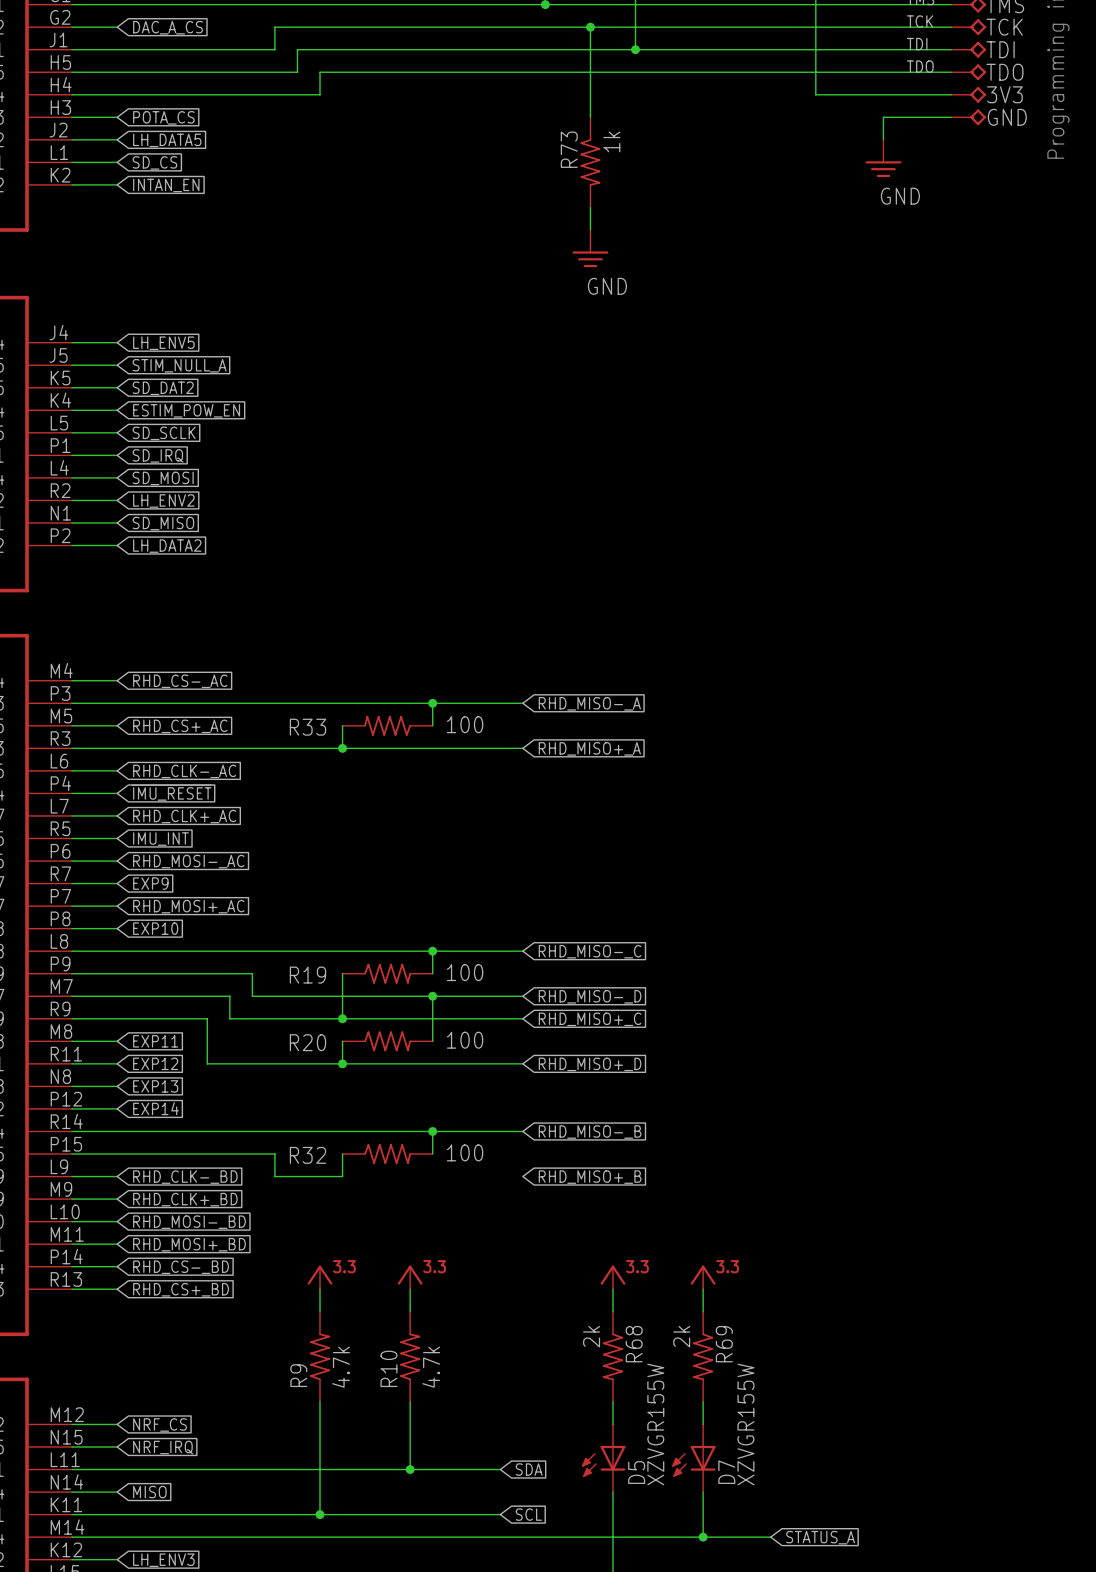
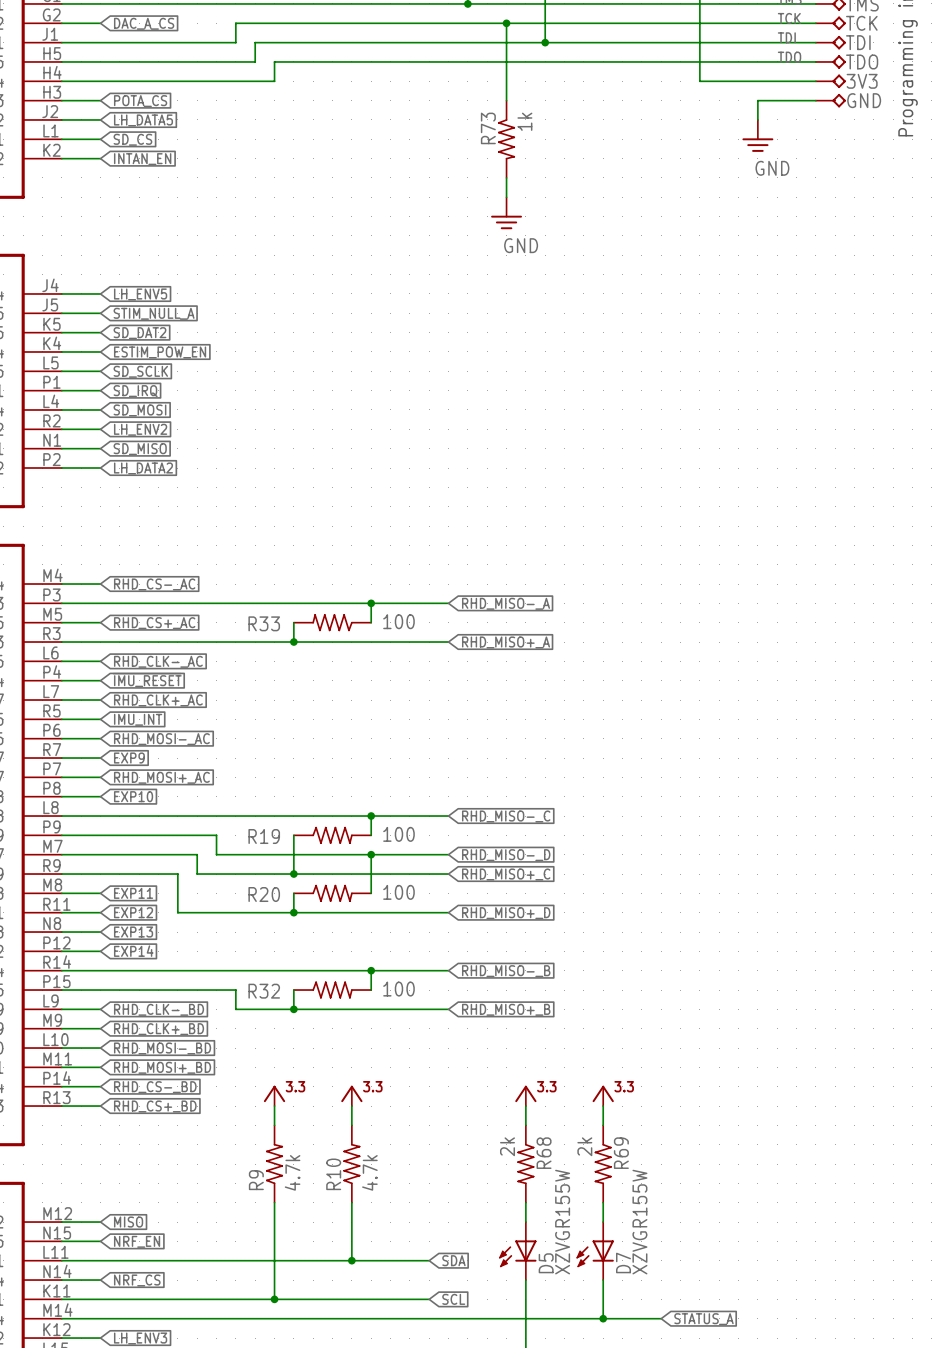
wire: none -> (293, 1009) (448, 1009)
junction: none -> (293, 1009)
global label: NRF_CS (160, 1424) -> MISO (128, 1222)
global label: NRF_IRQ (163, 1447) -> NRF_EN (137, 1241)
global label: MISO (149, 1492) -> NRF_CS (137, 1280)

